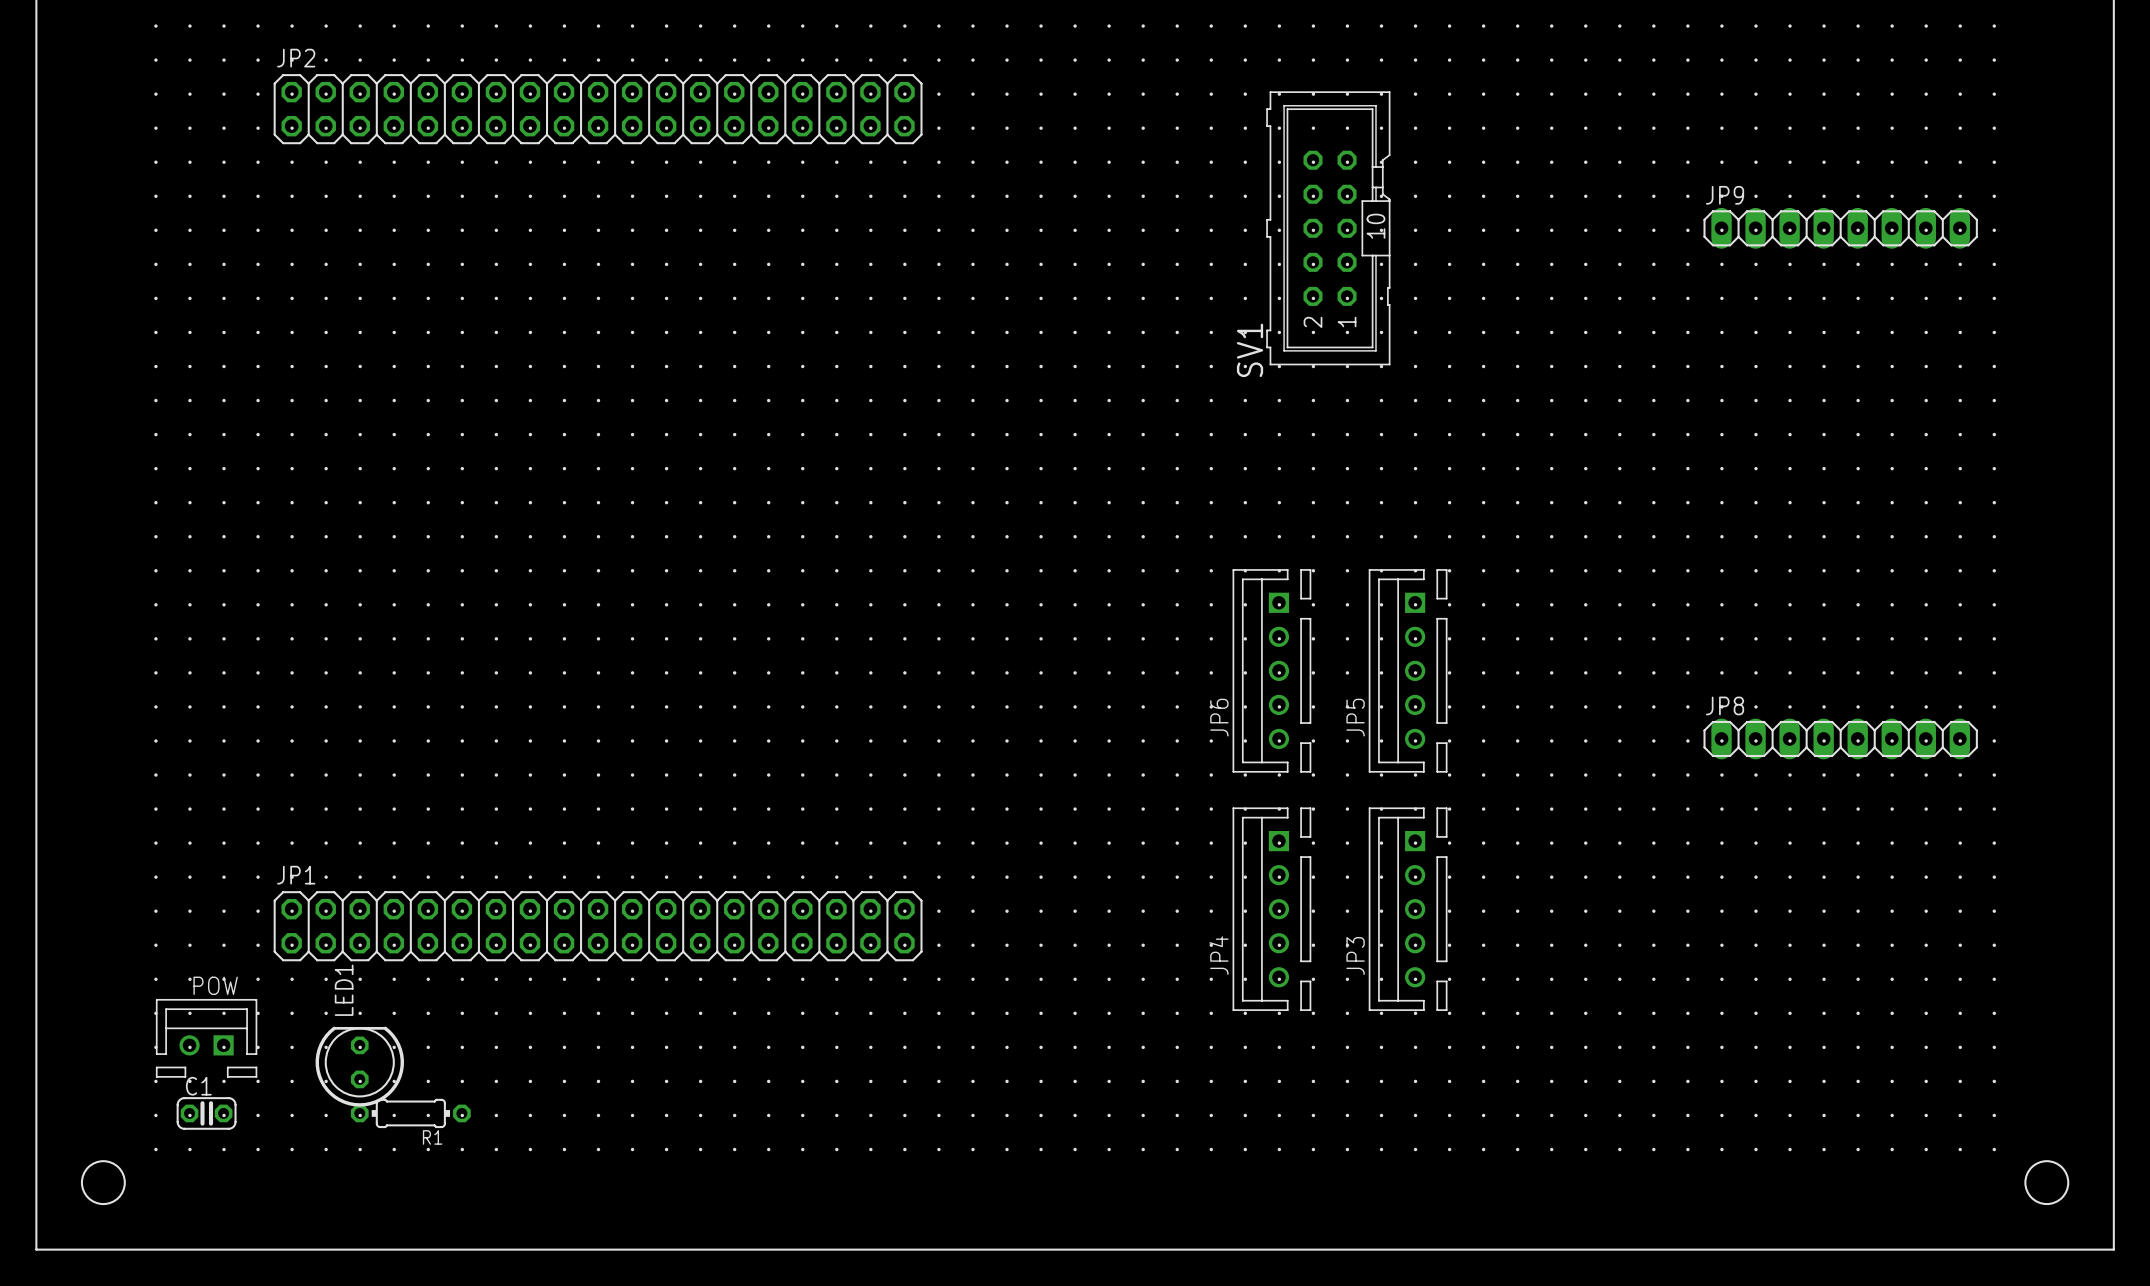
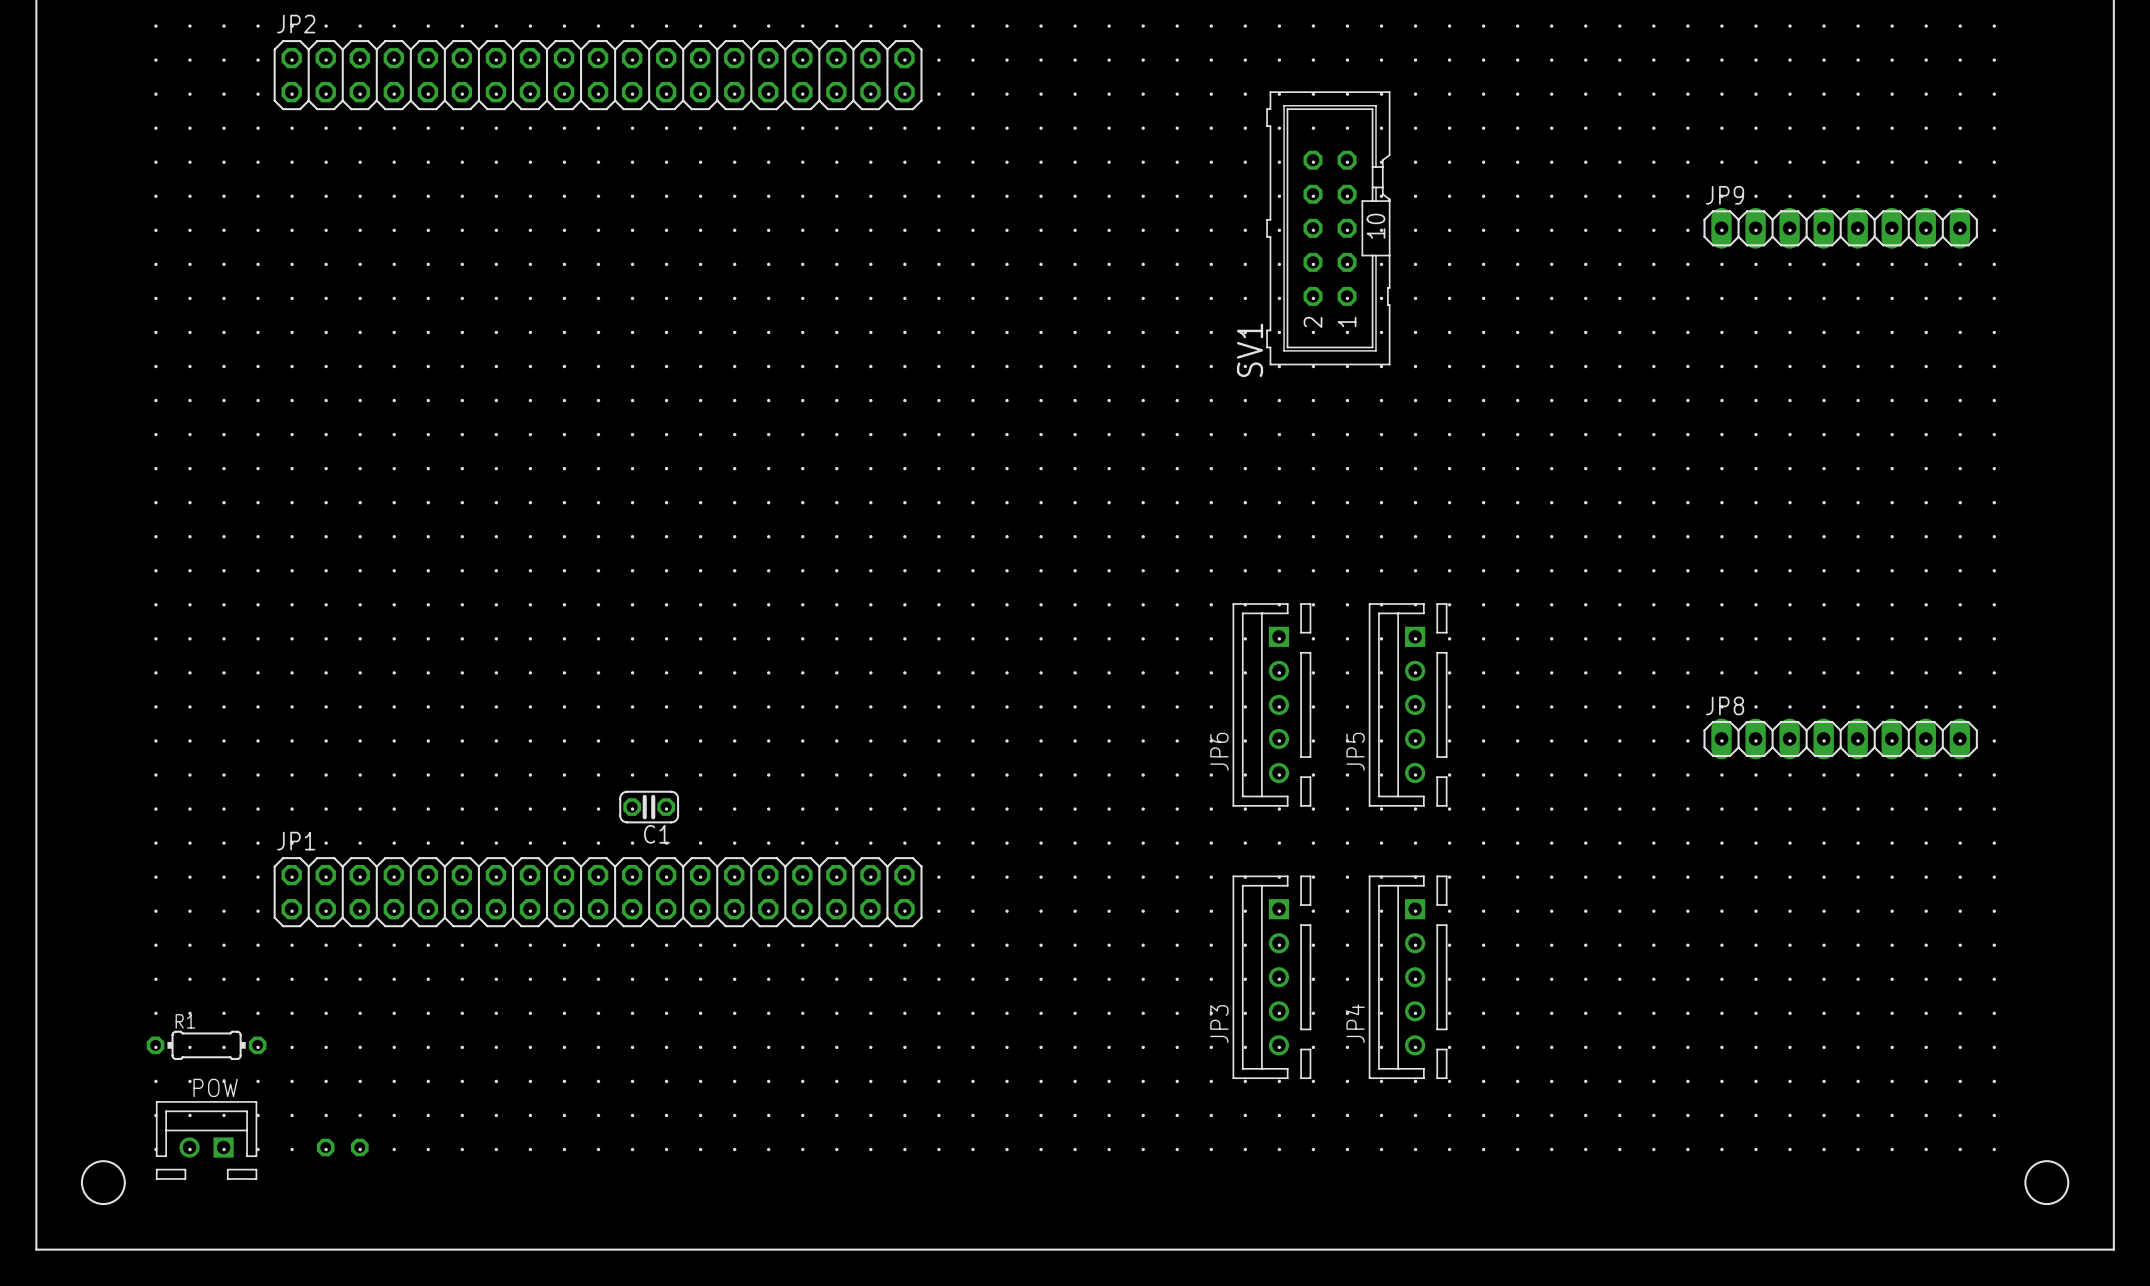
JP2 position: (598, 109) -> (598, 75)
JP6 position: (1271, 670) -> (1271, 704)
JP5 position: (1408, 670) -> (1408, 704)
JP4 position: (1271, 909) -> (1408, 977)
JP3 position: (1408, 909) -> (1271, 977)
JP1 position: (598, 926) -> (598, 892)
POW position: (206, 1038) -> (206, 1140)
LED1 side: top (359, 1066) -> bottom (342, 1147)
C1 rotation: 0° (206, 1113) -> 180° (649, 807)
C1 position: (206, 1113) -> (649, 807)
R1 position: (410, 1113) -> (206, 1045)
R1 name position: R1 (432, 1137) -> R1 (185, 1021)

